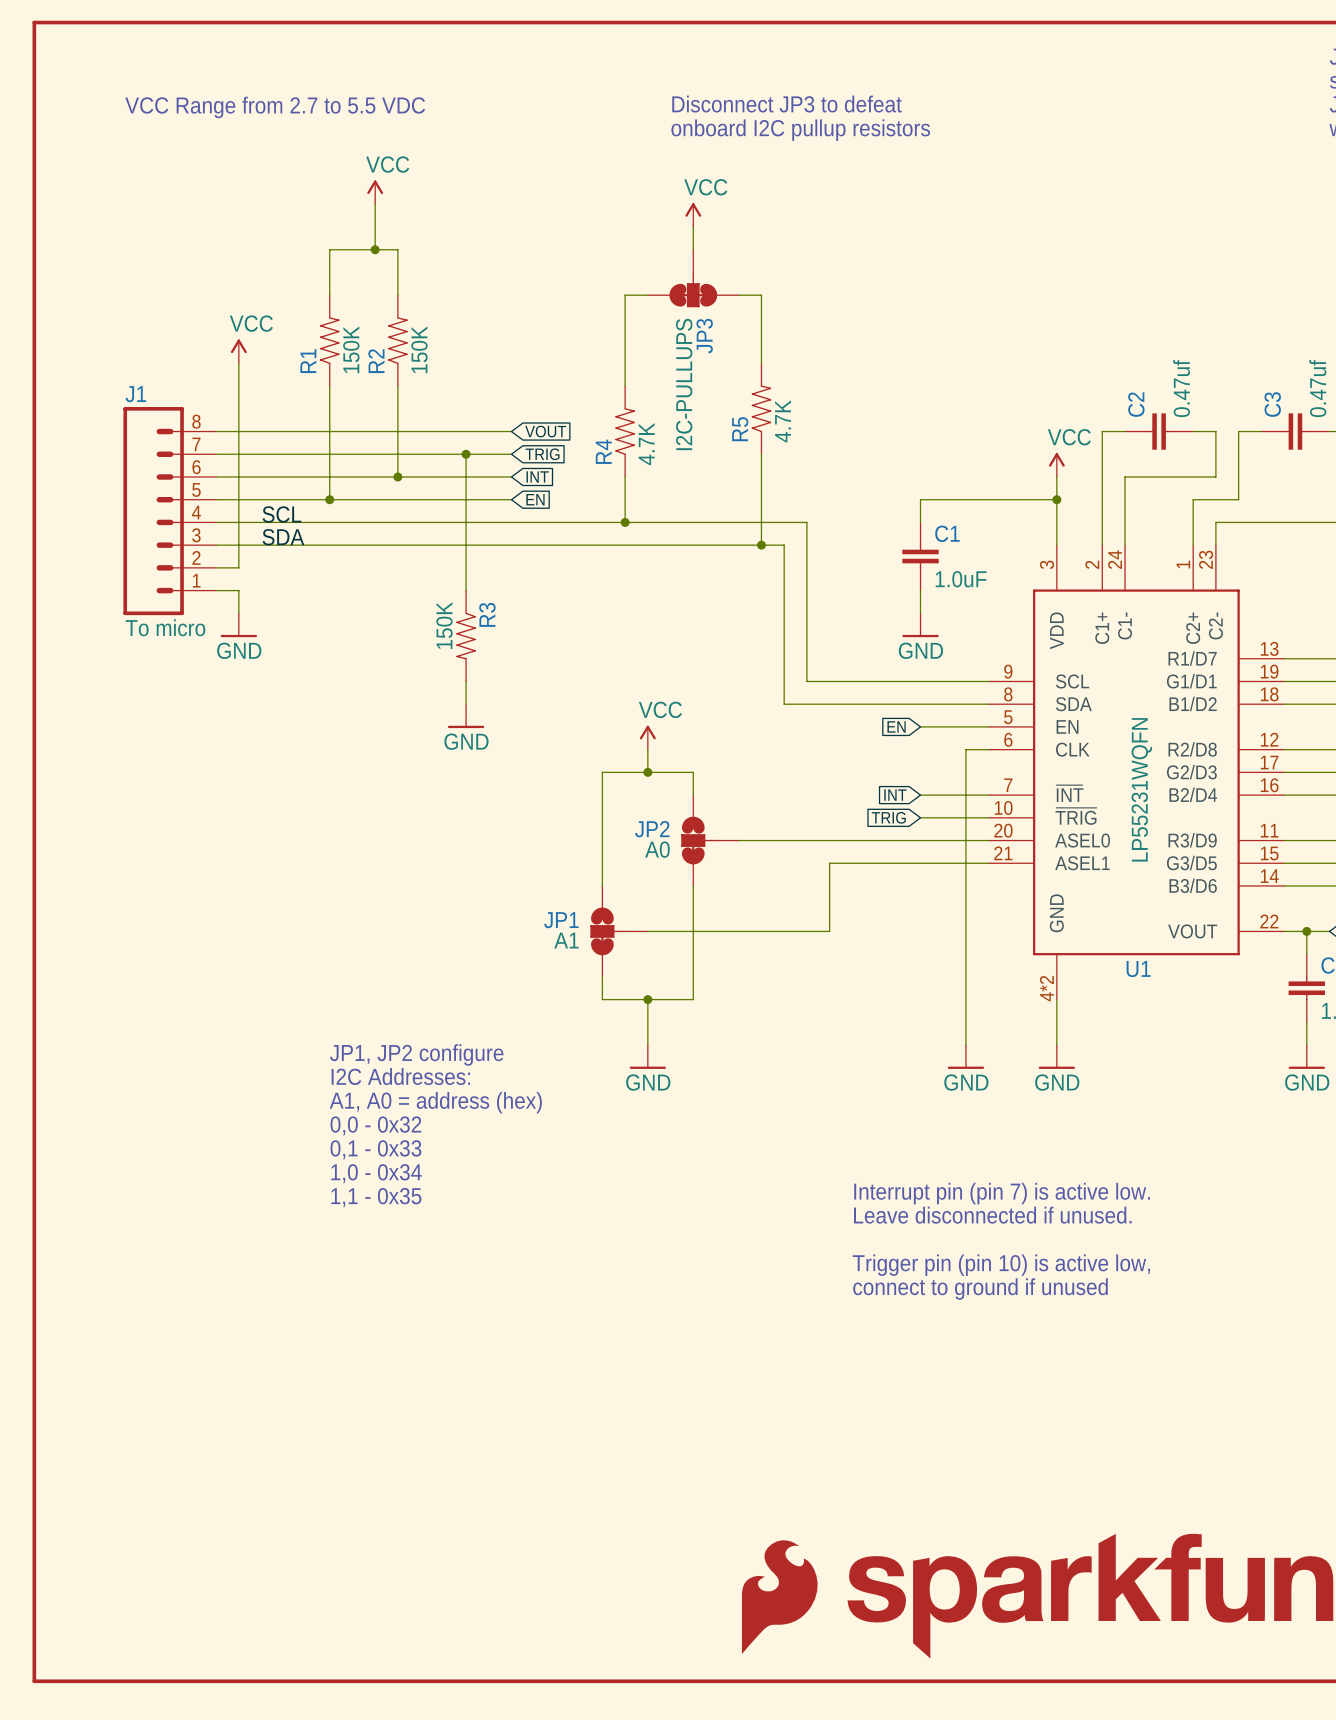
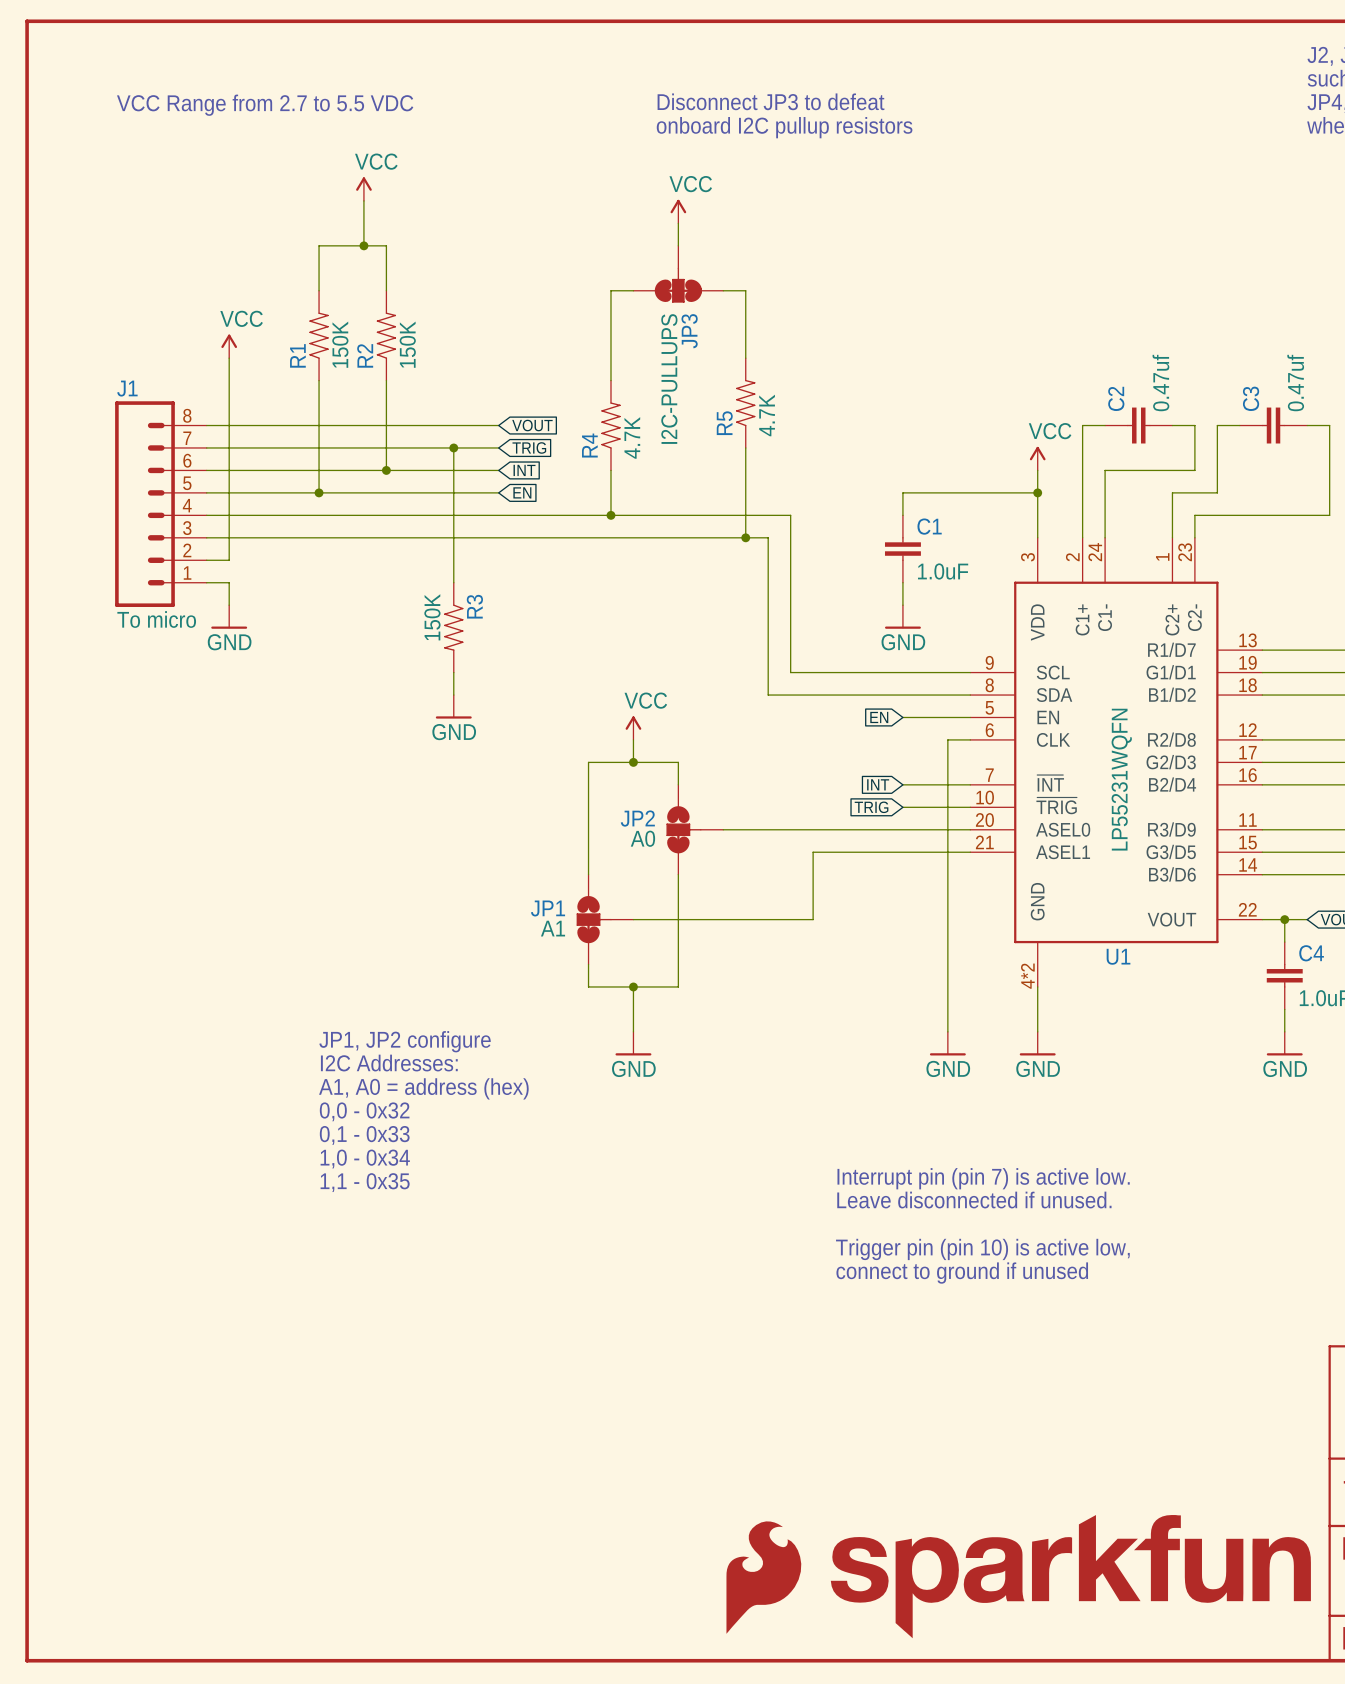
label: SCL (281, 514) -> none
label: SDA (283, 537) -> none

